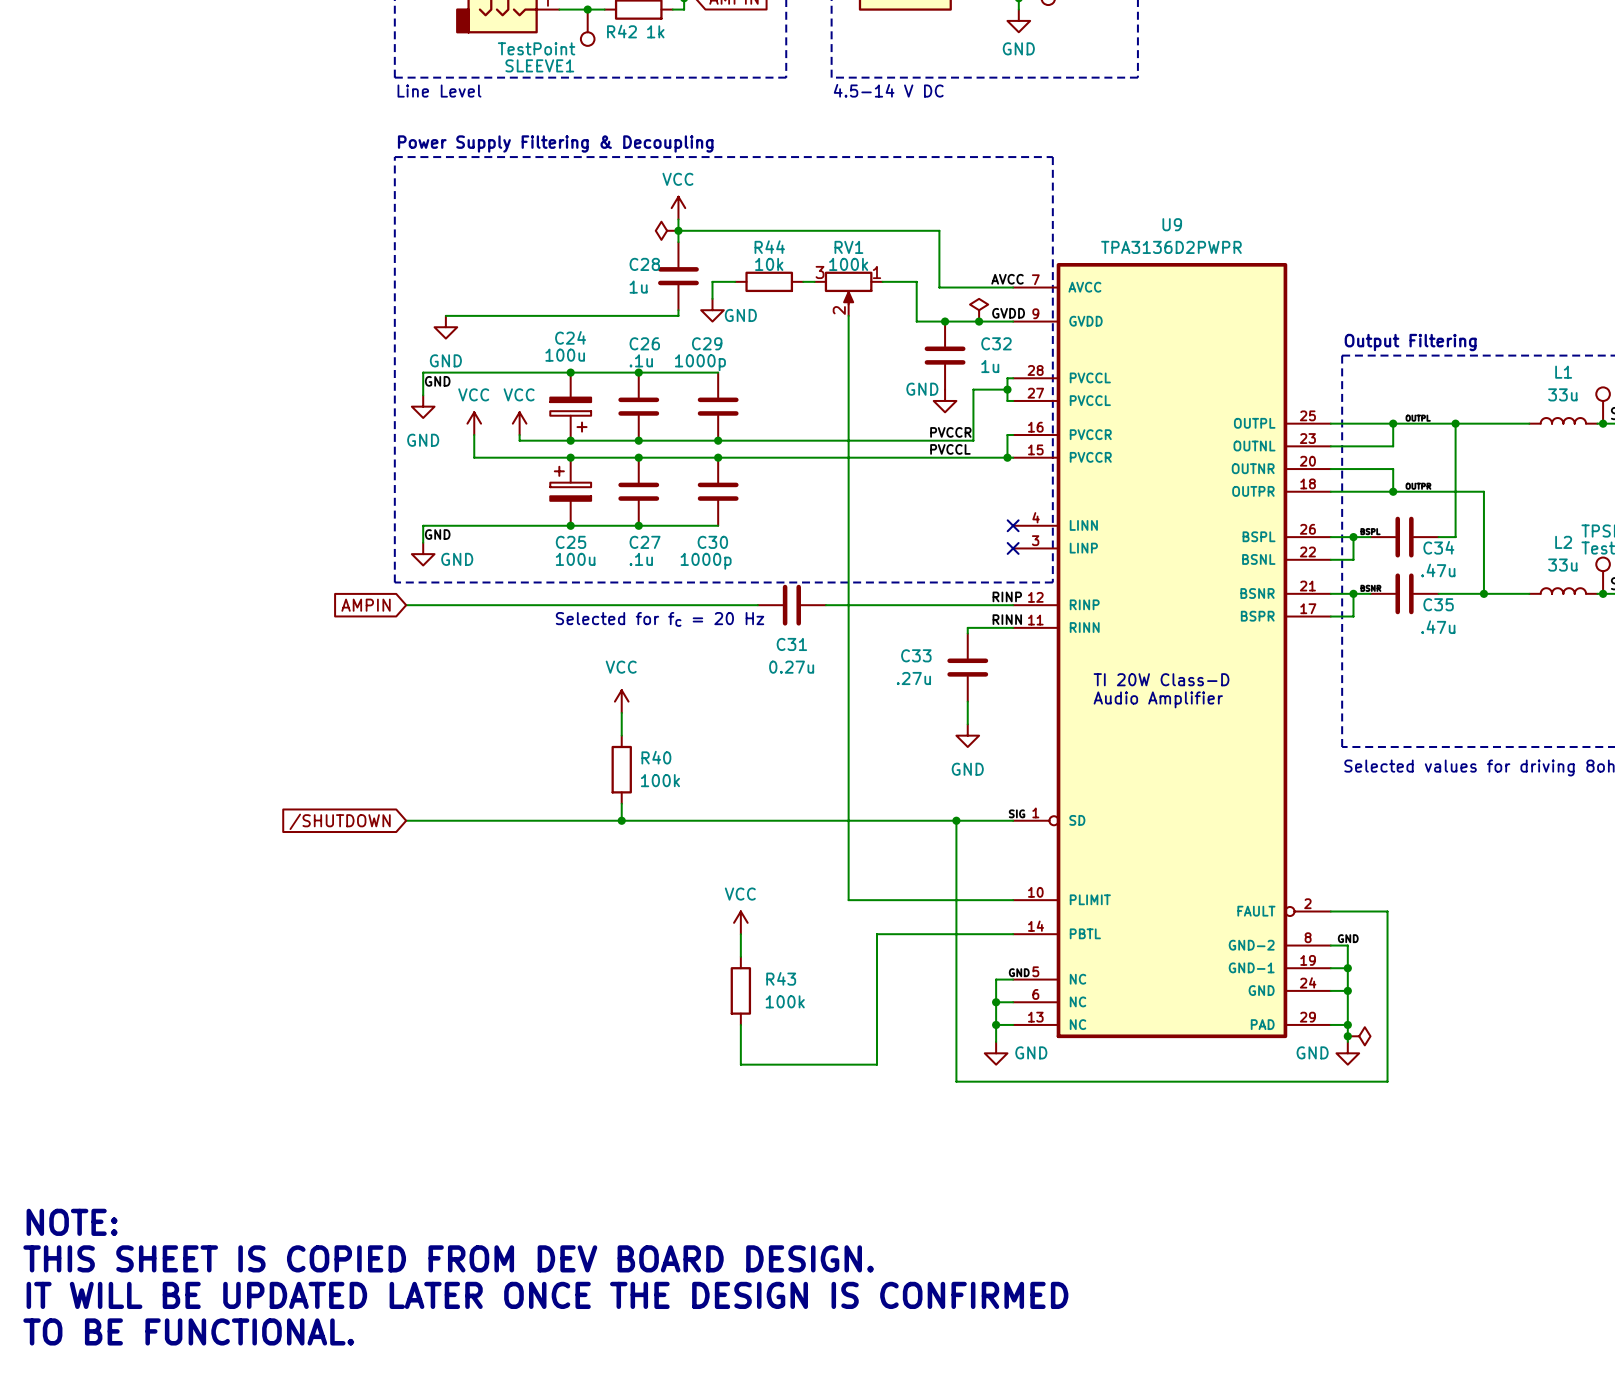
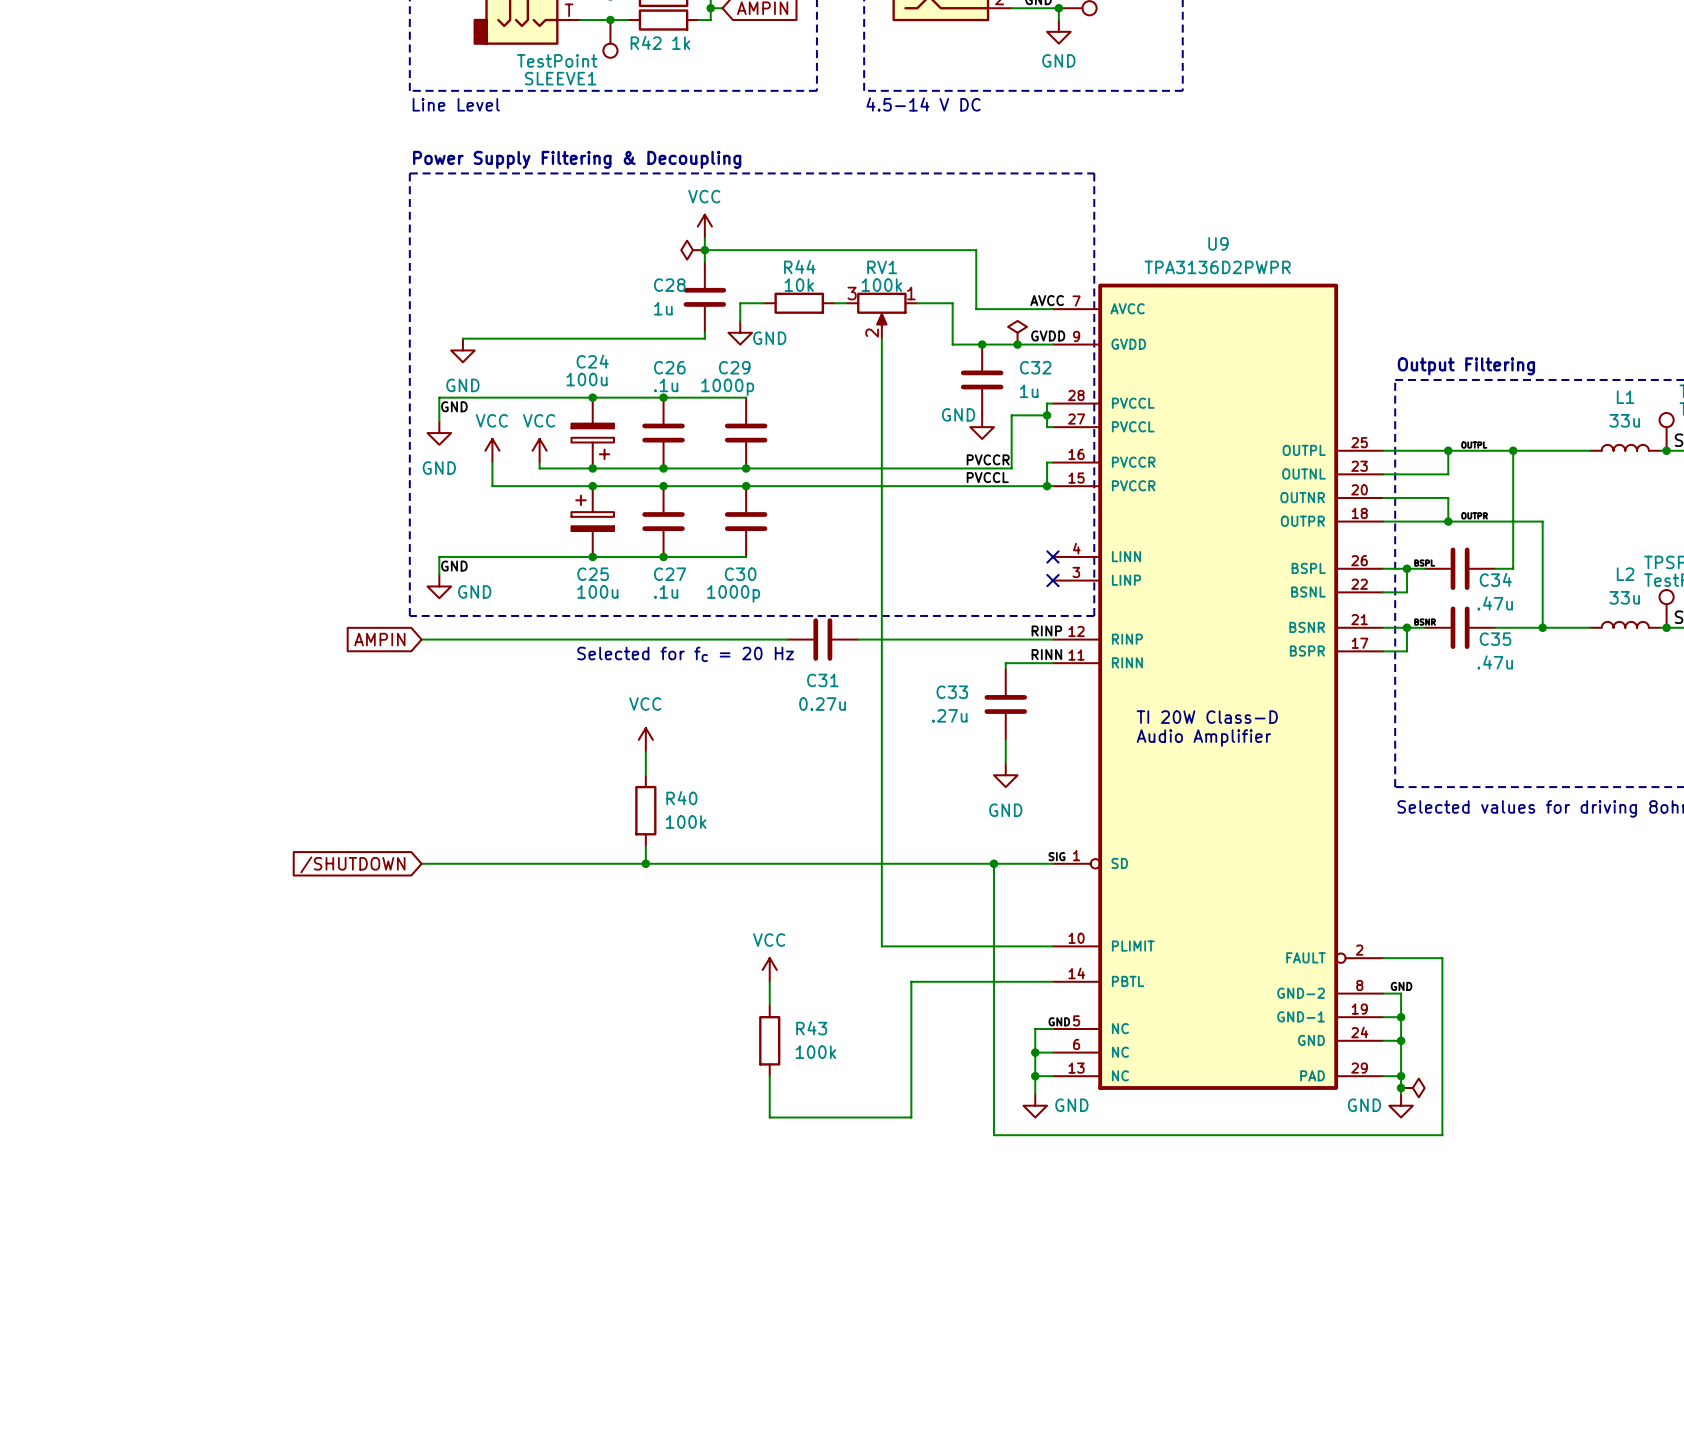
text: NOTE: (72, 1222) -> none
text: THIS SHEET IS COPIED FROM DEV BOARD DESIGN. (448, 1258) -> none
text: IT WILL BE UPDATED LATER ONCE THE DESIGN IS CONFIRMED (547, 1295) -> none
text: TO BE FUNCTIONAL. (188, 1331) -> none

